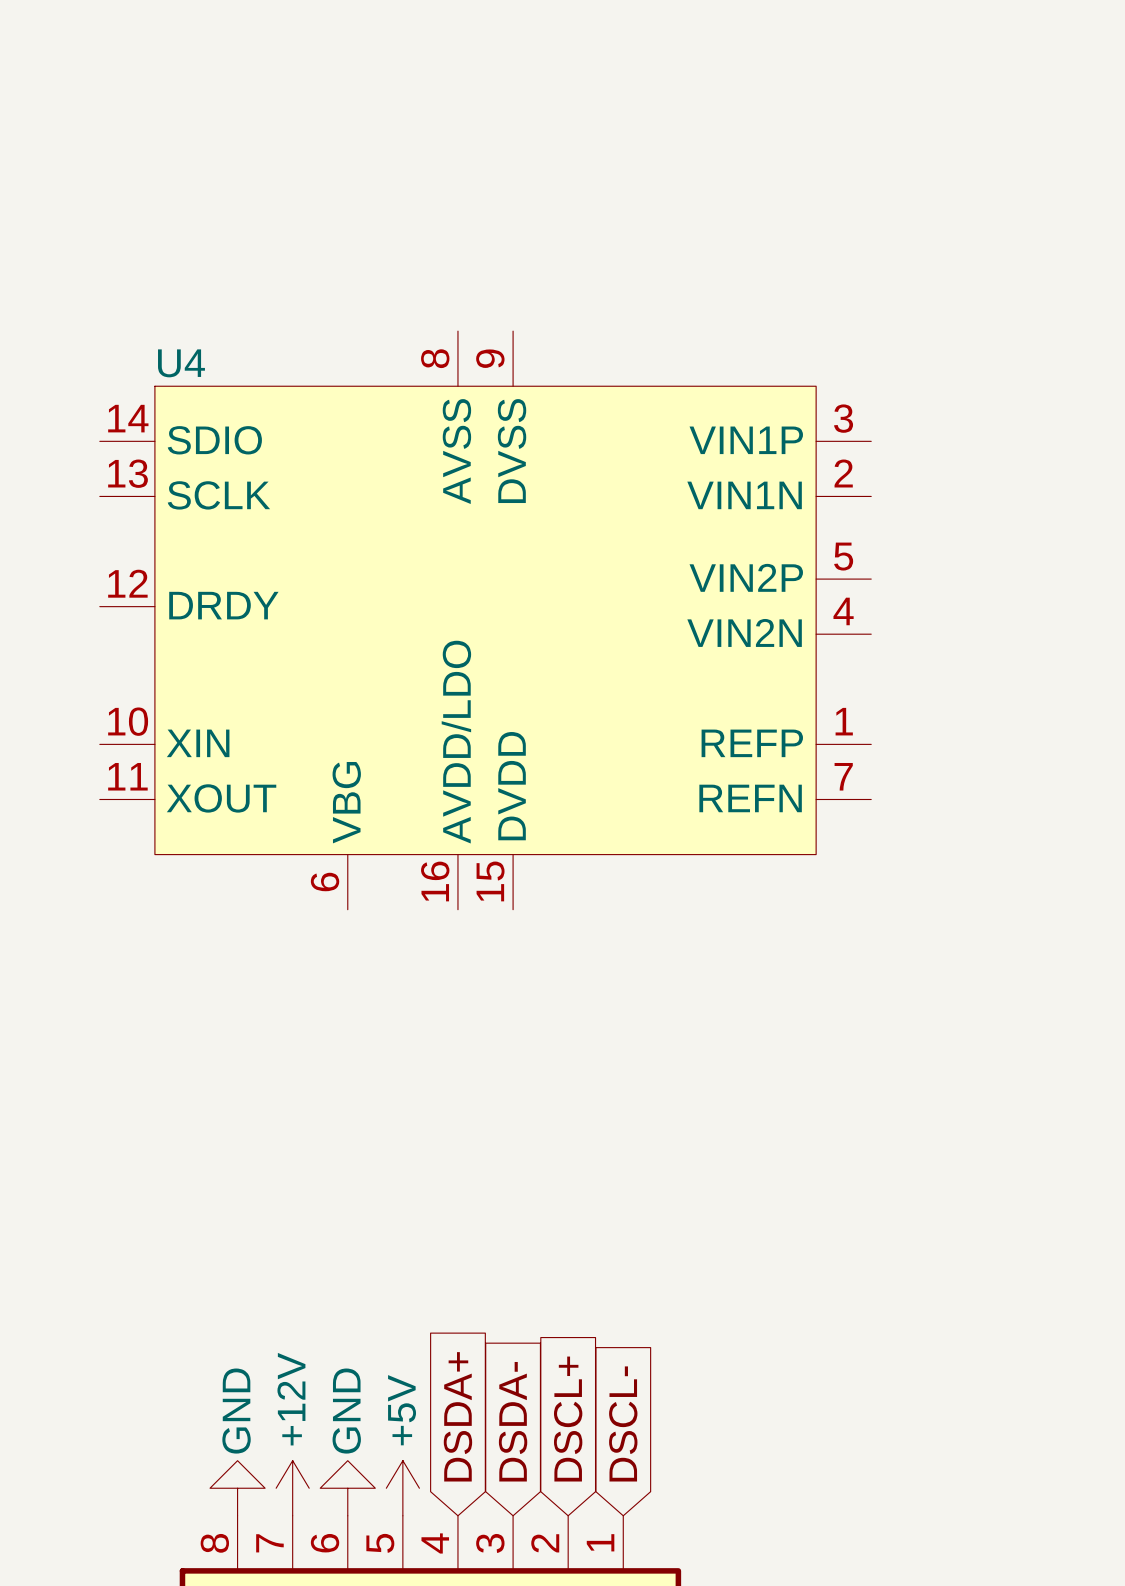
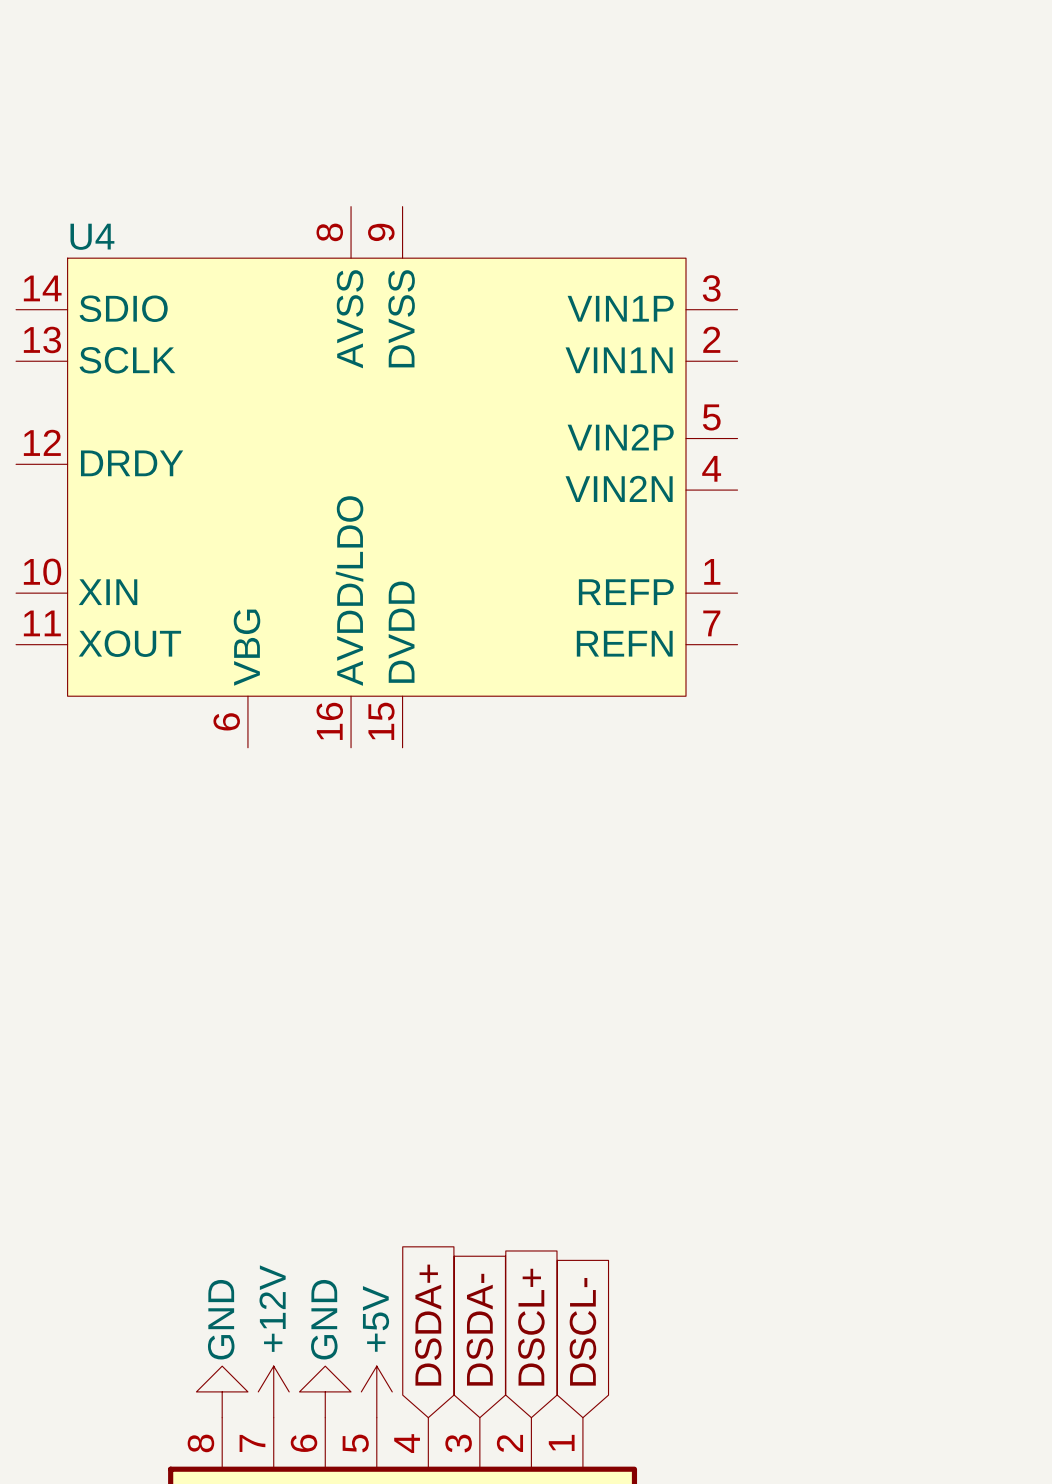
U4 position: (485, 620) -> (376, 477)

